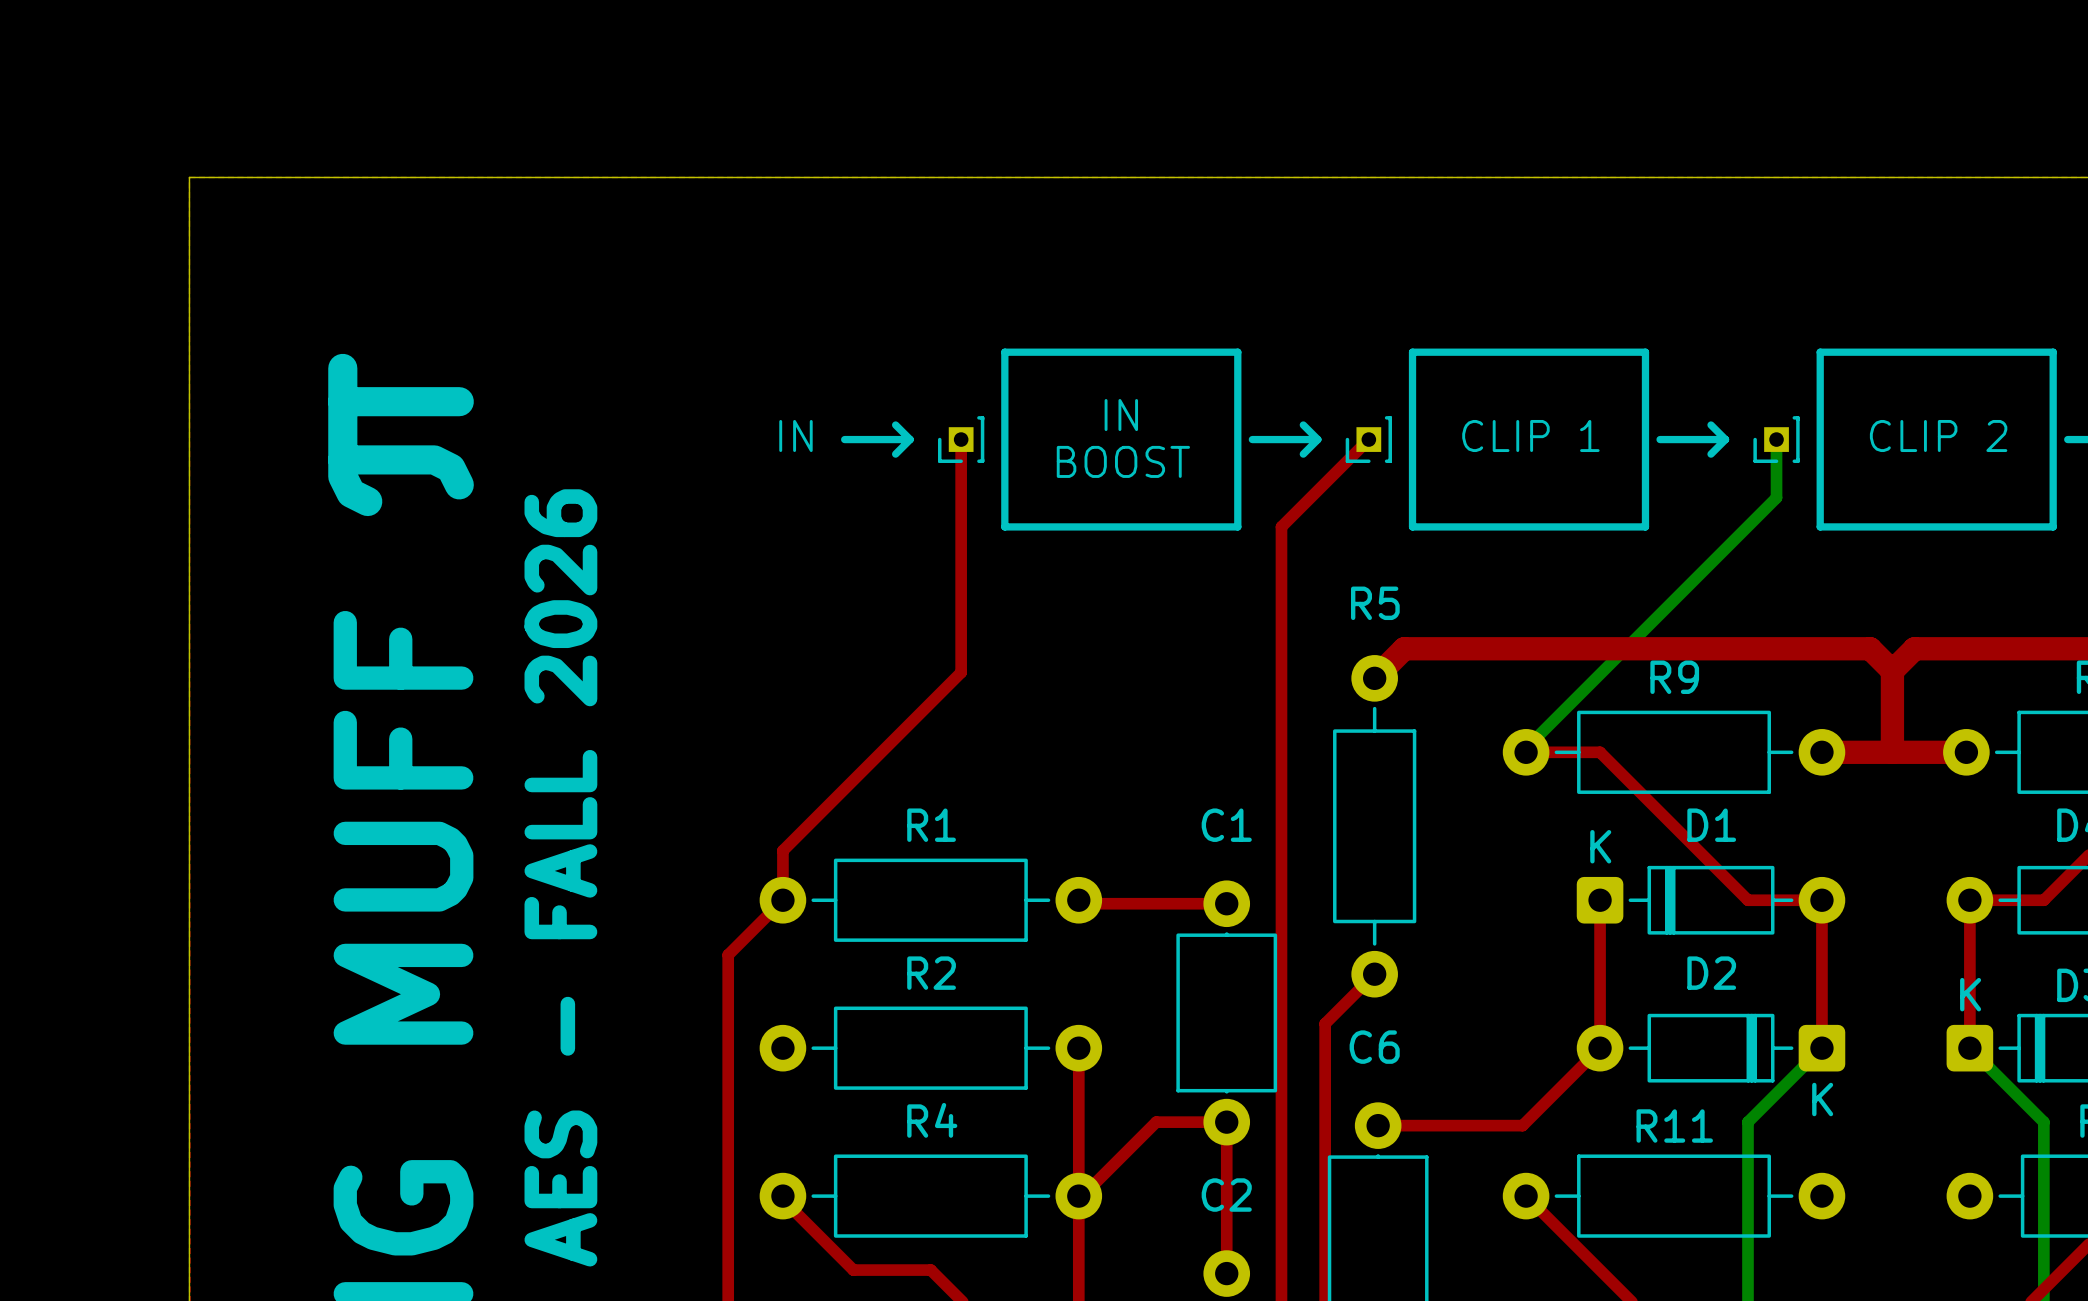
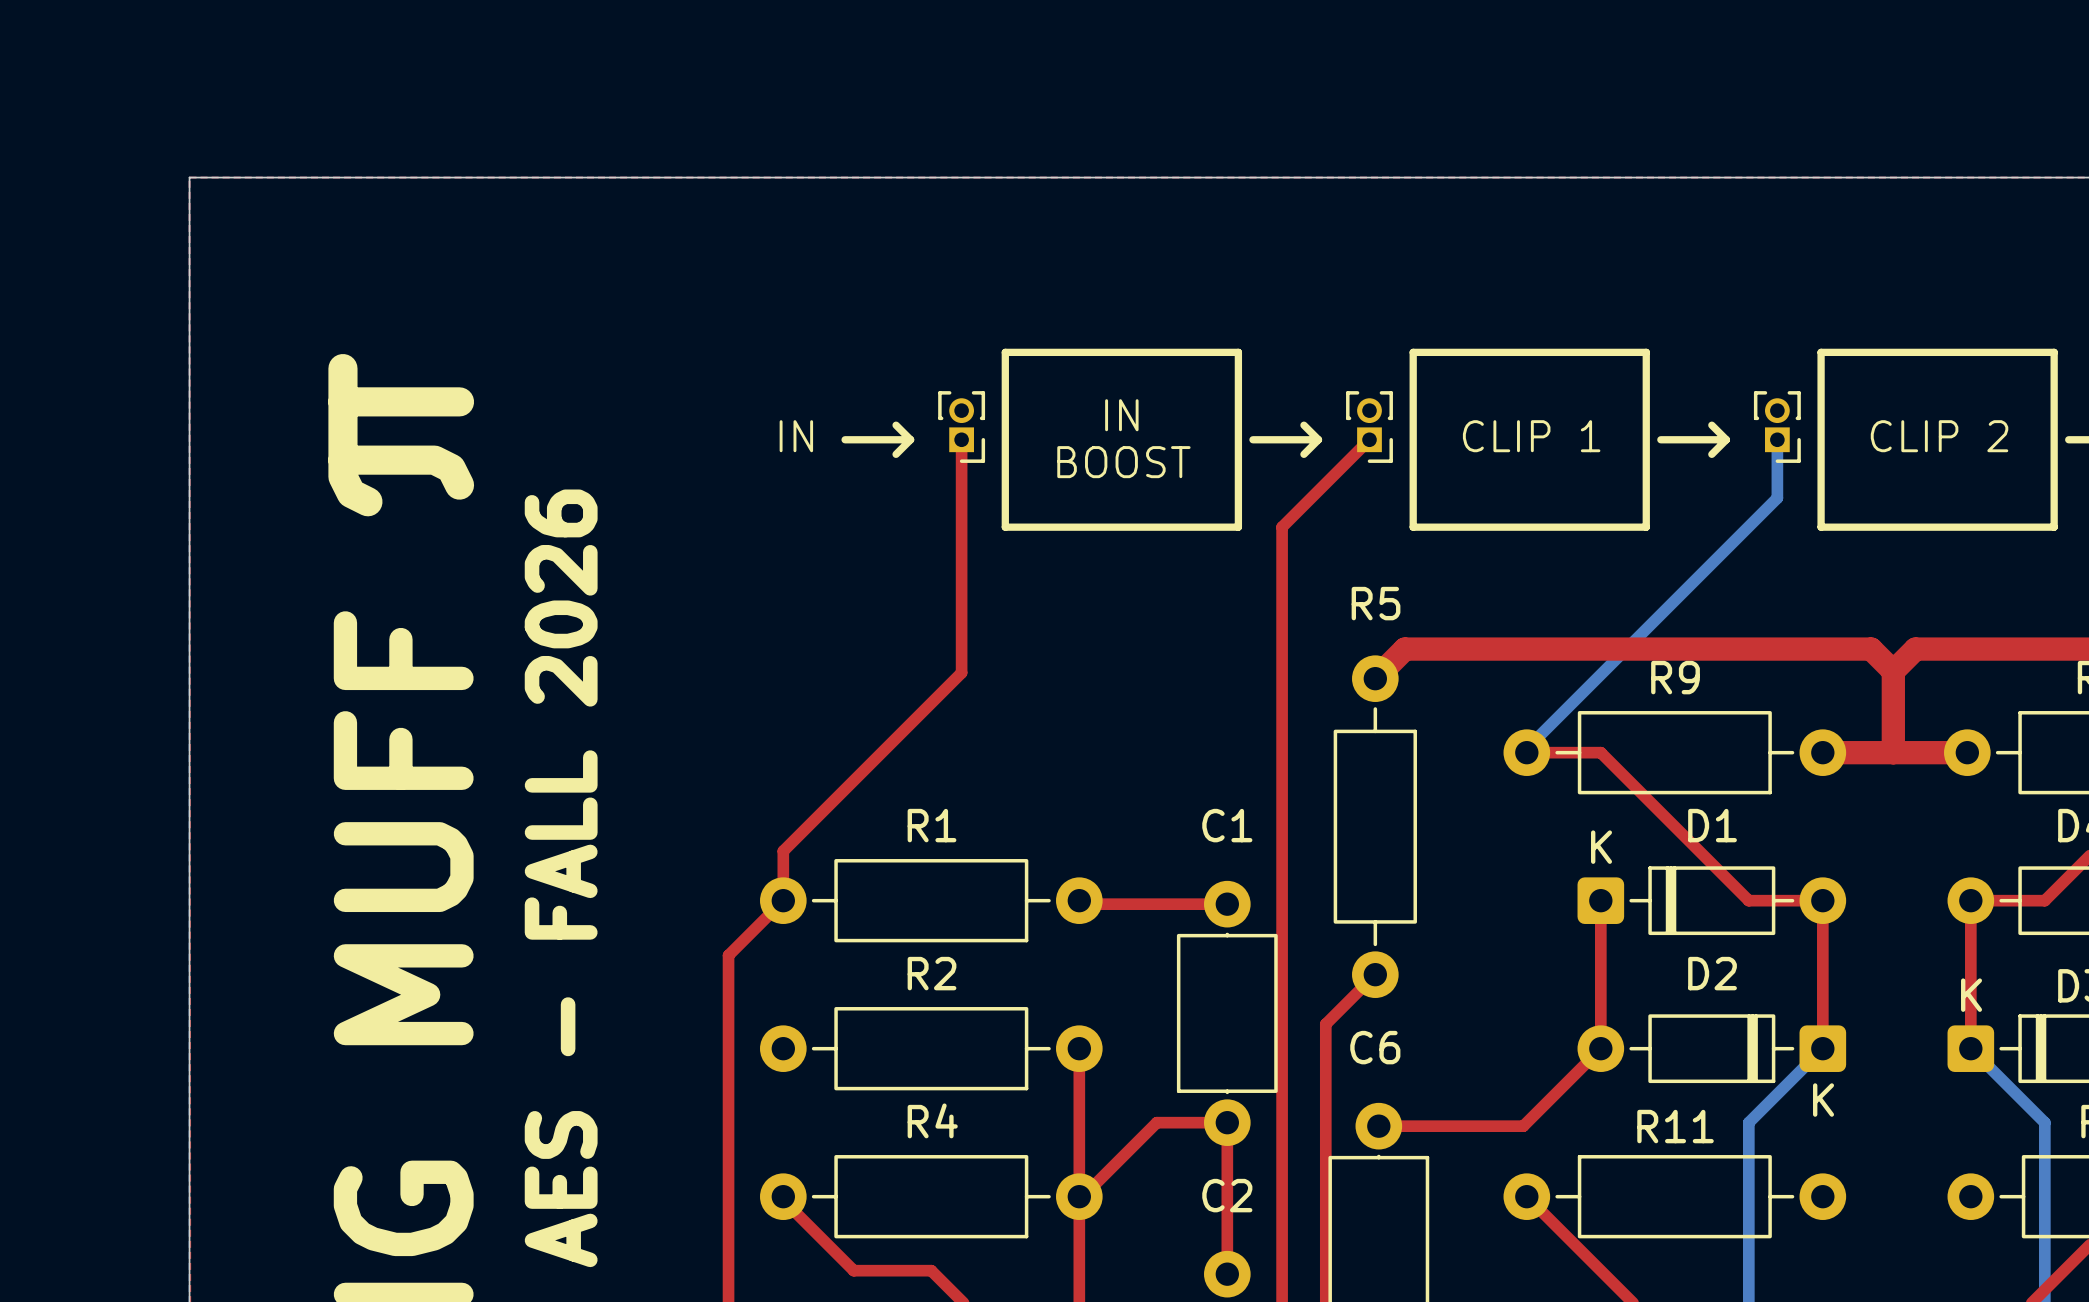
part footprint: [938, 416, 985, 464] -> [938, 391, 986, 463]
part footprint: [1345, 416, 1392, 464] -> [1346, 391, 1393, 463]
part footprint: [1753, 416, 1800, 464] -> [1753, 391, 1801, 463]

